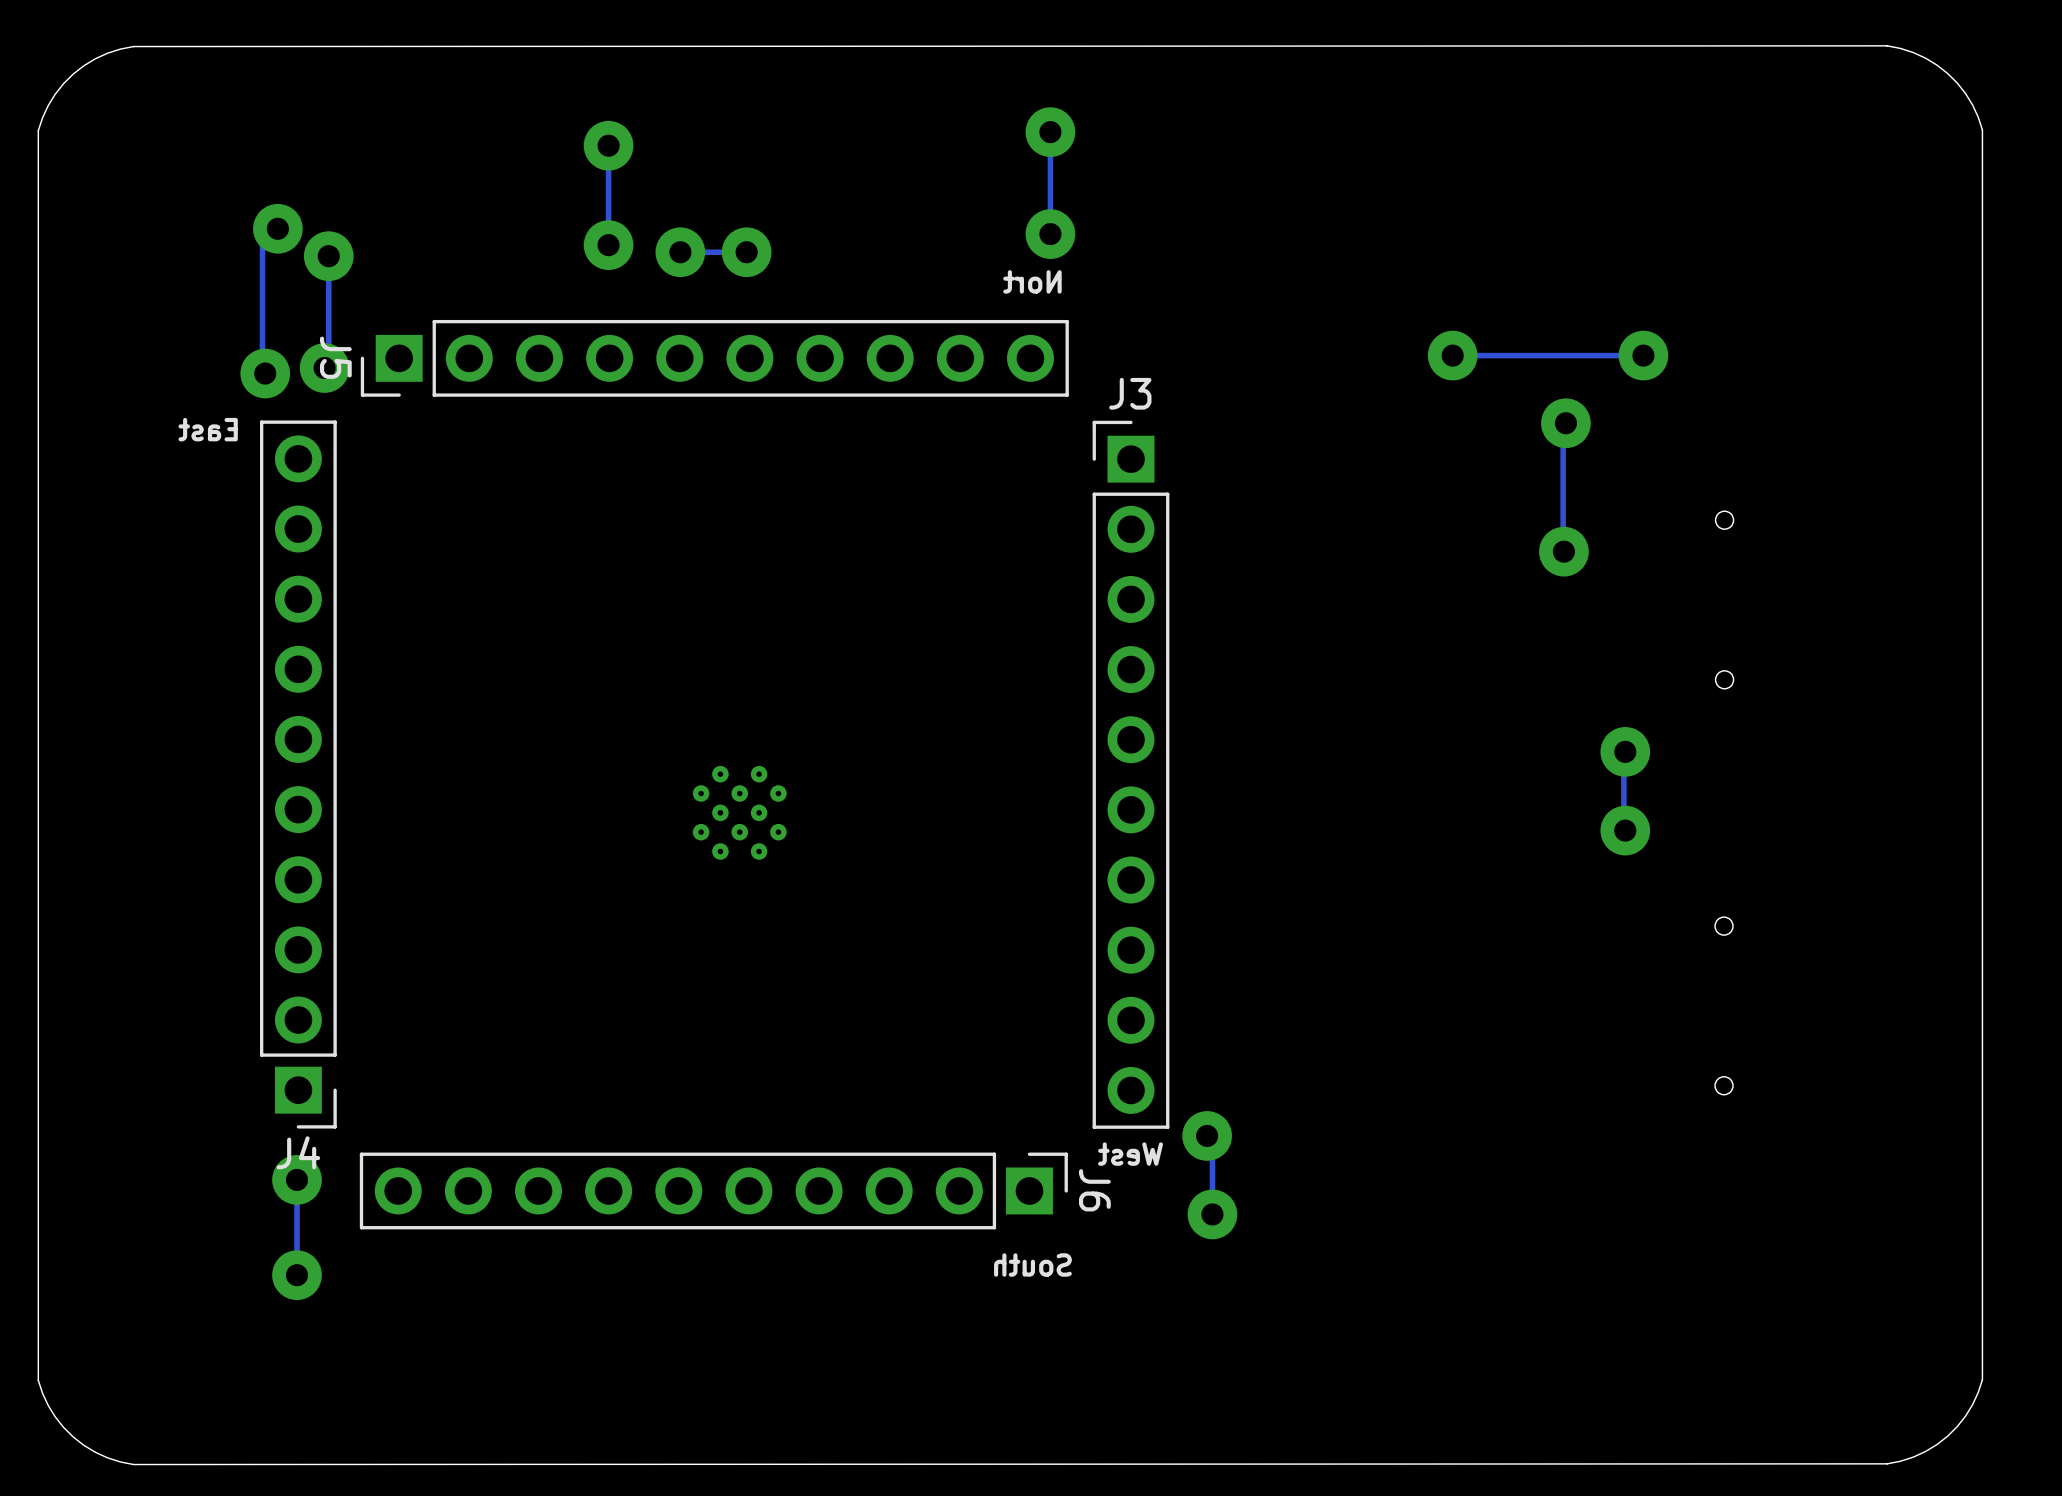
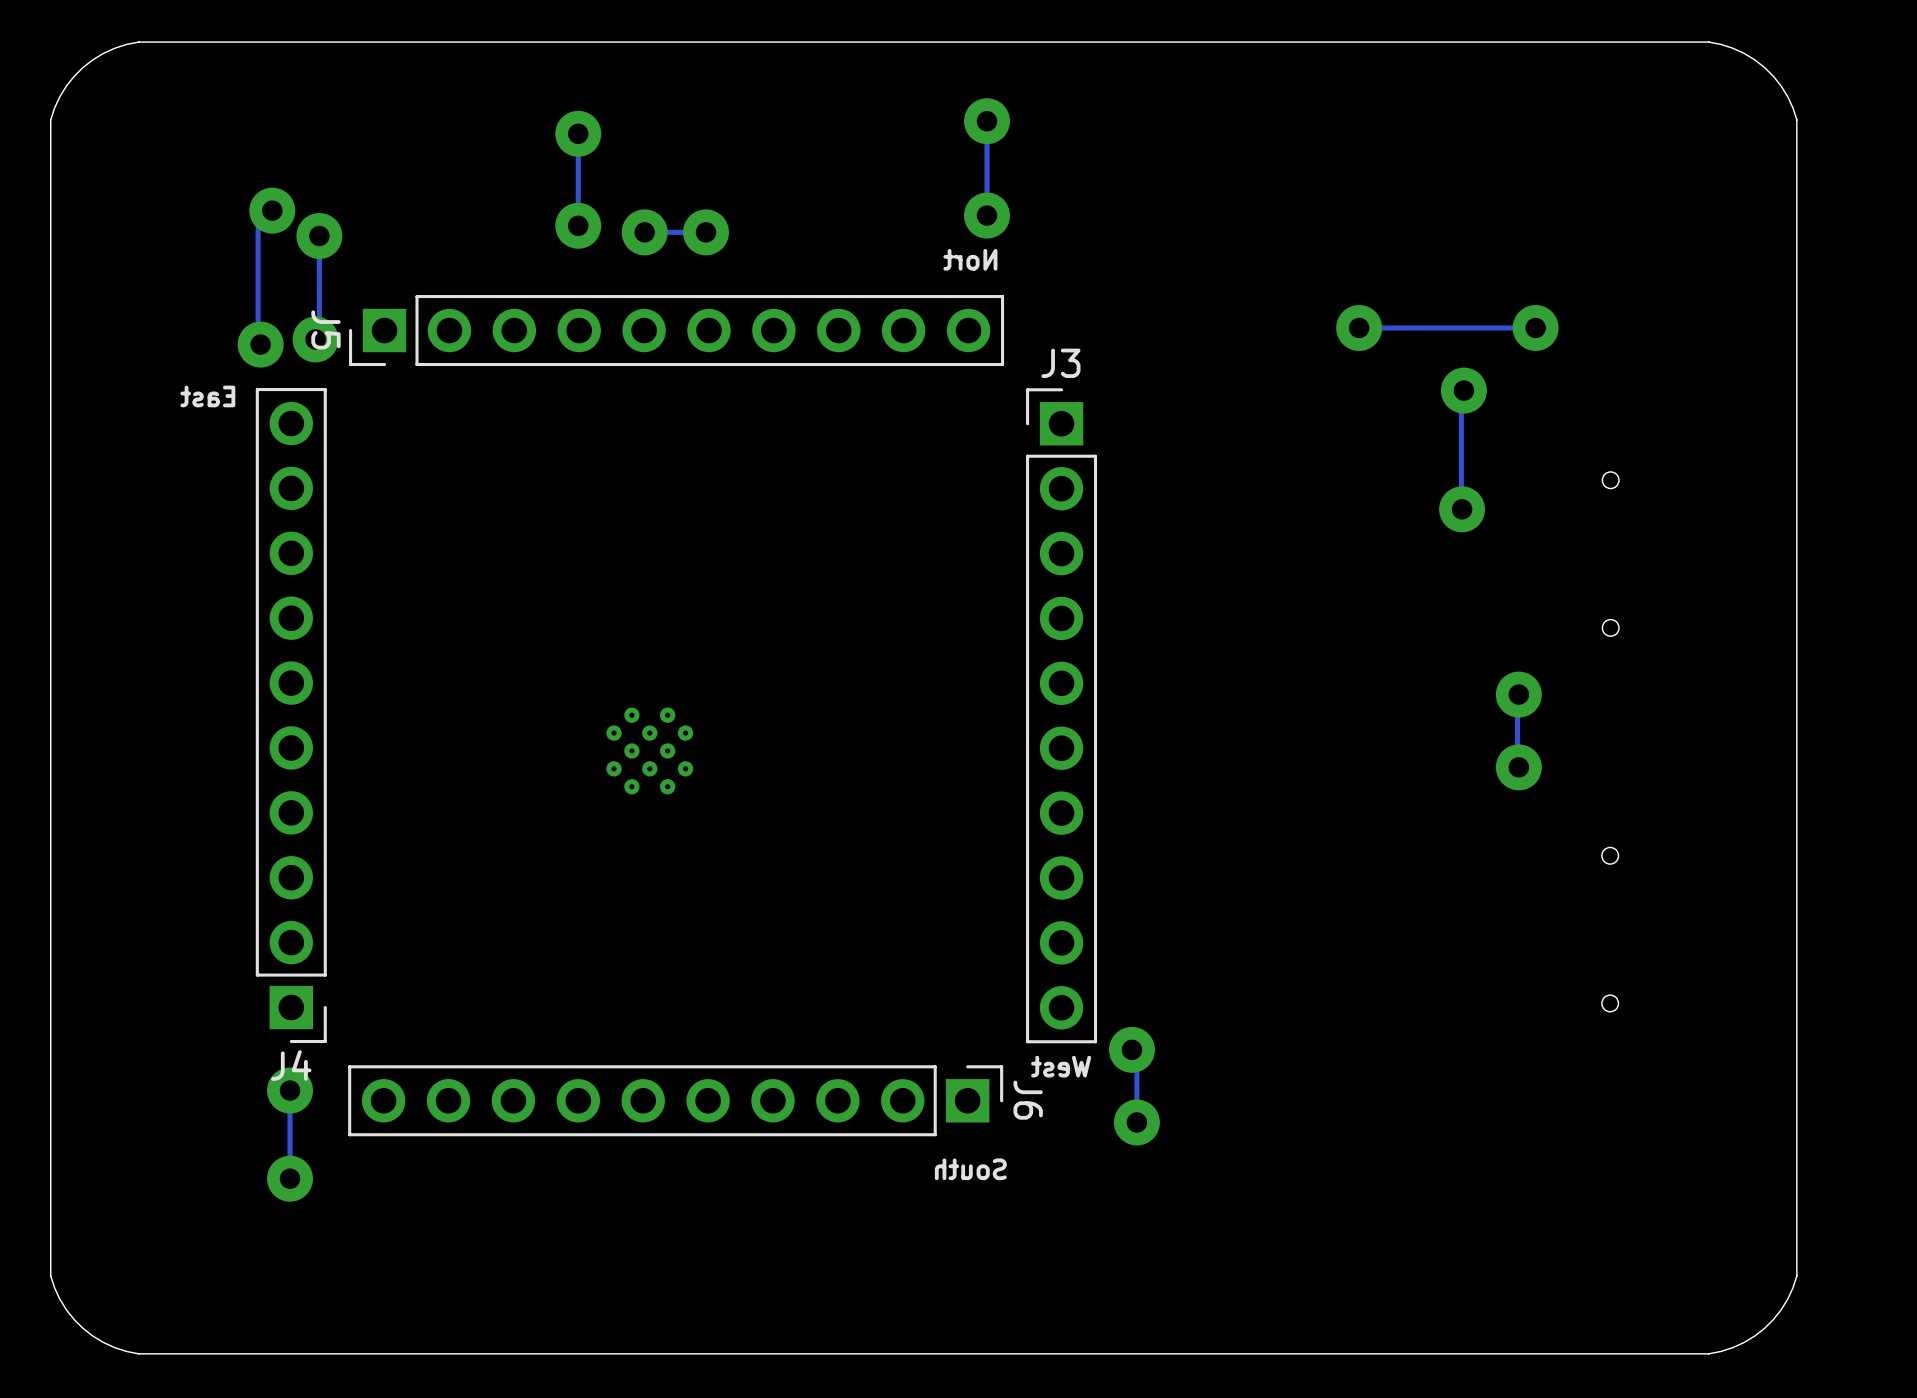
board edge: (133, 46) (1887, 45) (1913, 52) (1925, 58) (1947, 73) (1965, 93) (1978, 117) (1982, 130) (1982, 1379) (1972, 1404) (1965, 1416) (1957, 1426) (1936, 1444) (1913, 1457) (1887, 1463) (133, 1464) -> (138, 42) (1708, 42) (1732, 48) (1764, 67) (1781, 86) (1796, 119) (1796, 1275) (1781, 1309) (1754, 1335) (1732, 1347) (1708, 1353) (138, 1353)
part position: (739, 812) -> (649, 750)

